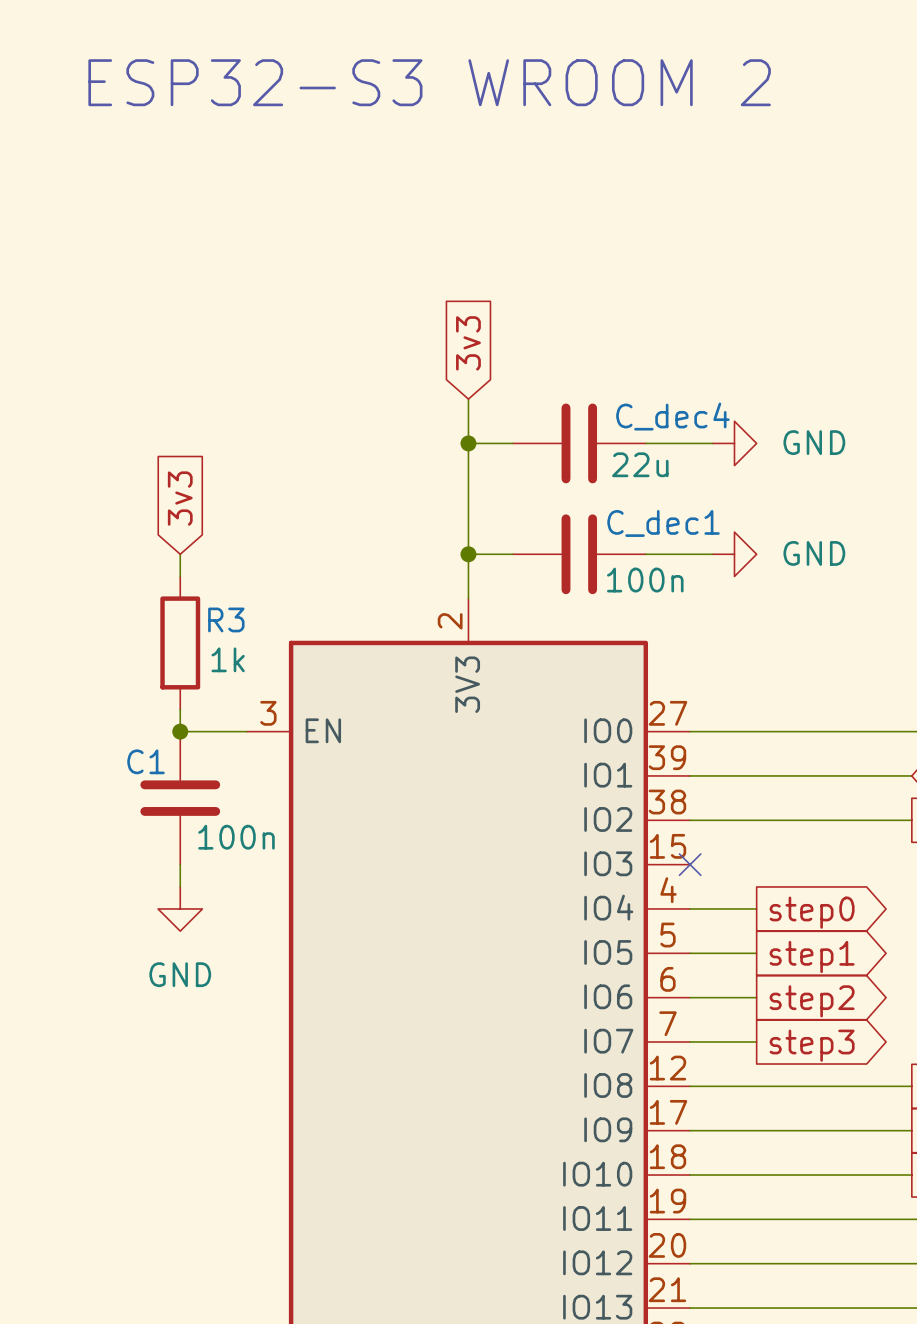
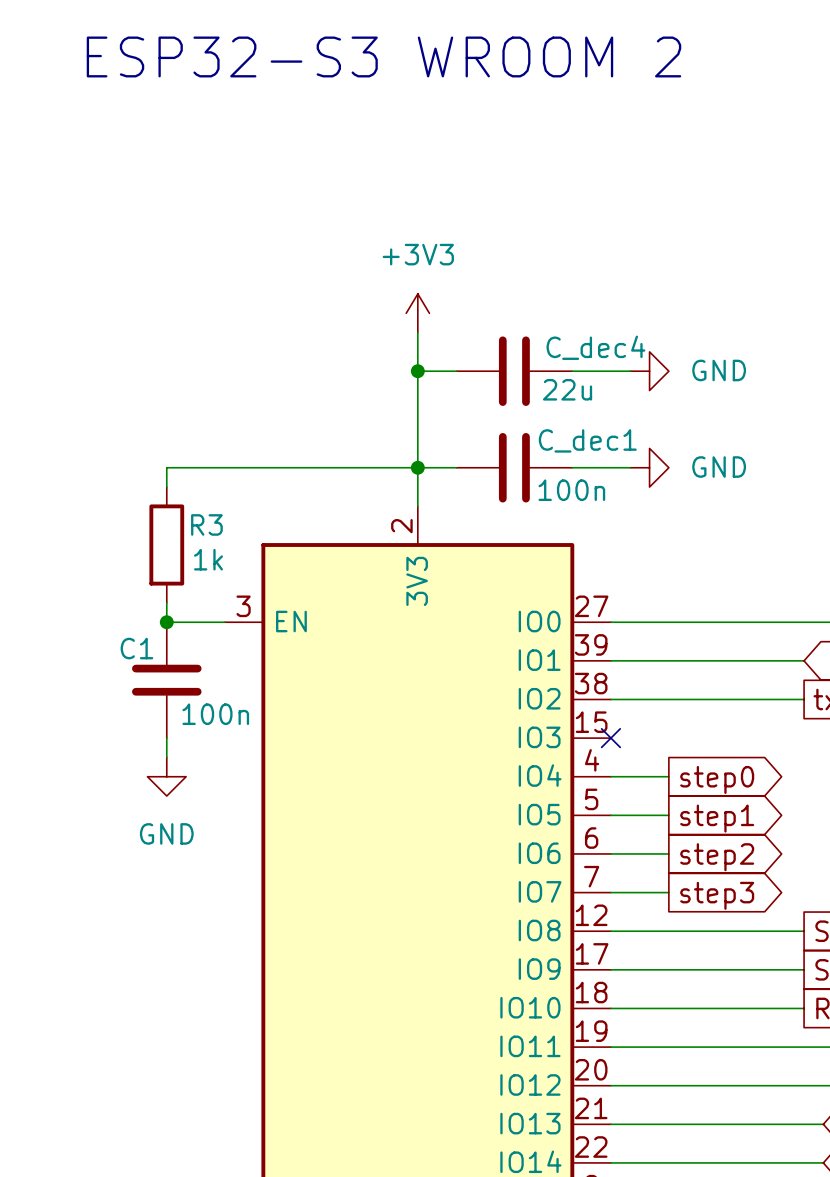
global label: 3v3 (468, 343) -> none
power symbol: none -> +3V3 (417, 313)
global label: 3v3 (180, 498) -> none
wire: none -> (166, 467) (417, 467)

